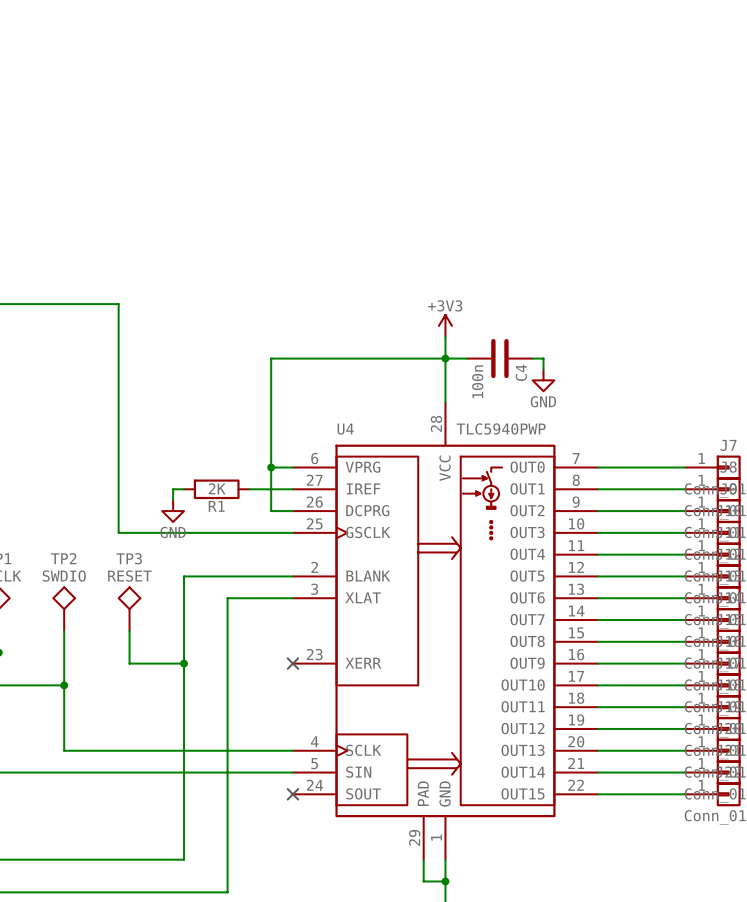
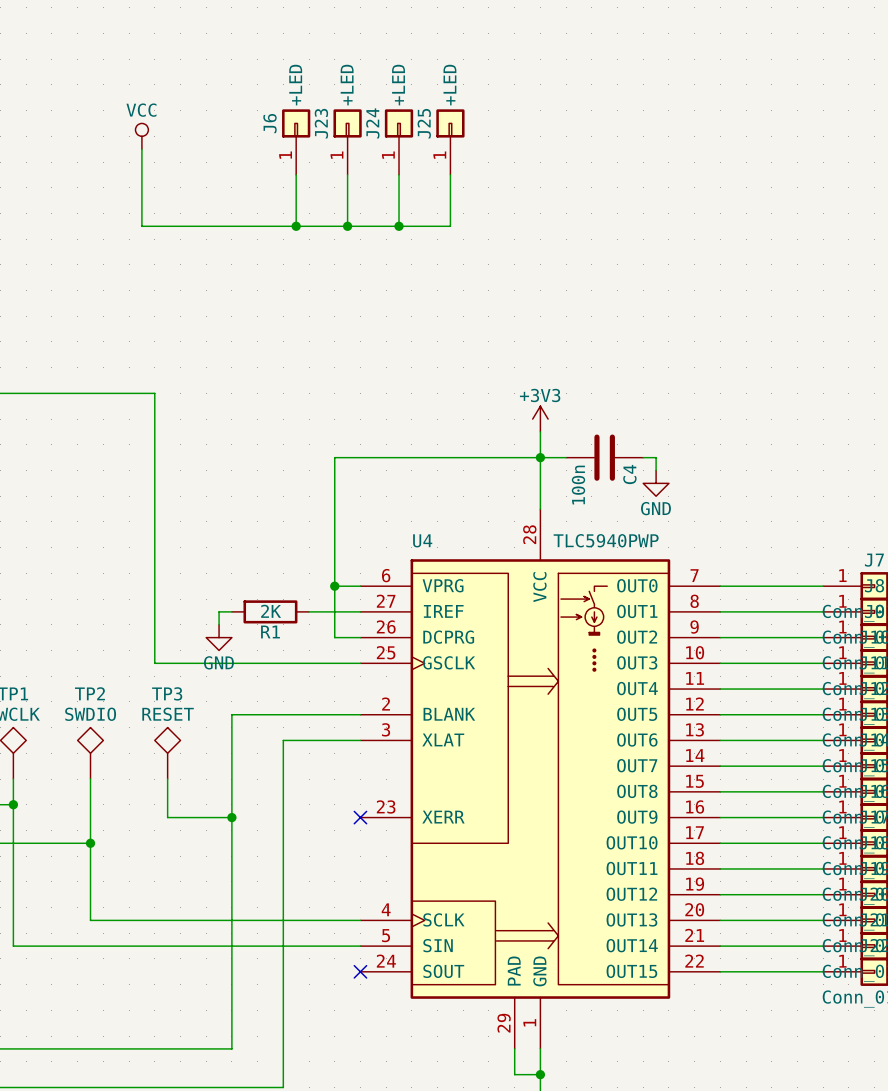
power symbol: none -> VCC (141, 136)
J6: none -> +LED (296, 142)
J23: none -> +LED (347, 142)
J24: none -> +LED (399, 142)
J25: none -> +LED (450, 142)
wire: none -> (141, 149) (141, 226) (450, 226) (450, 174)
wire: none -> (296, 174) (296, 226)
wire: none -> (347, 174) (347, 226)
wire: none -> (399, 174) (399, 226)
junction: none -> (296, 226)
junction: none -> (347, 226)
junction: none -> (399, 226)

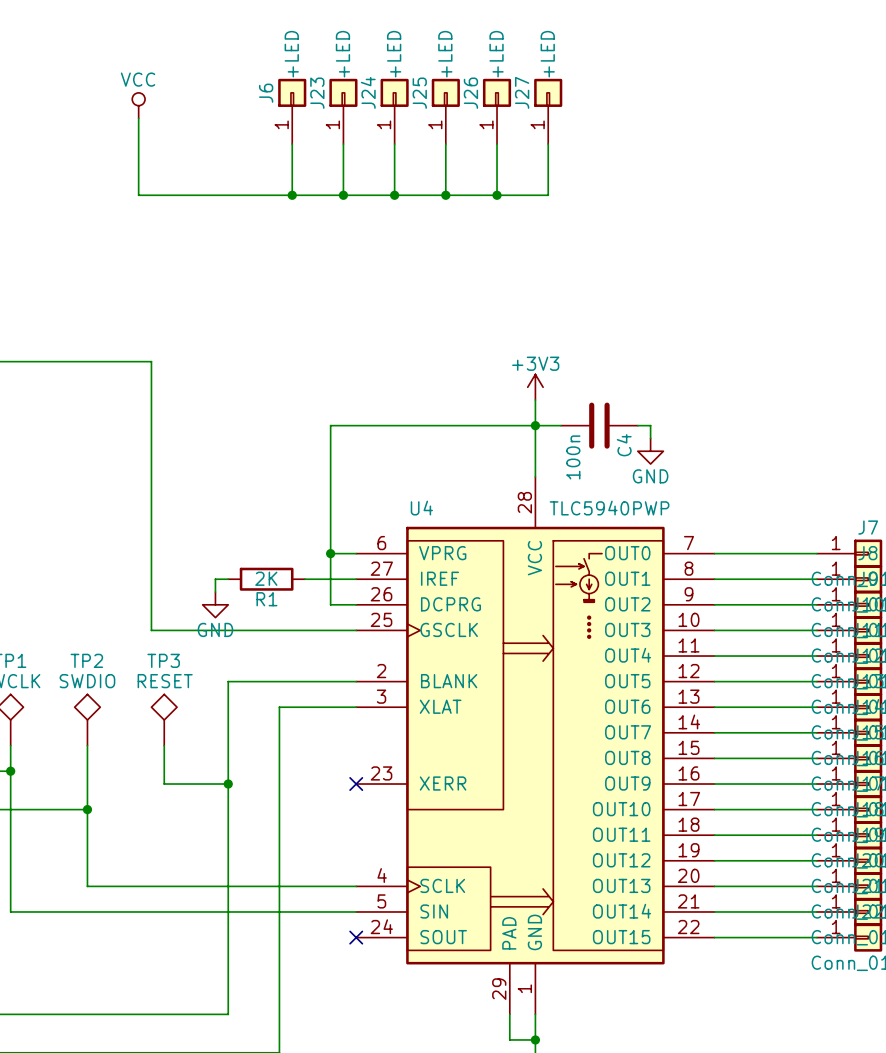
J26: none -> +LED (497, 111)
J27: none -> +LED (548, 111)
wire: none -> (497, 144) (497, 195)
wire: none -> (548, 144) (548, 195) (445, 195)
junction: none -> (445, 195)
junction: none -> (497, 195)

